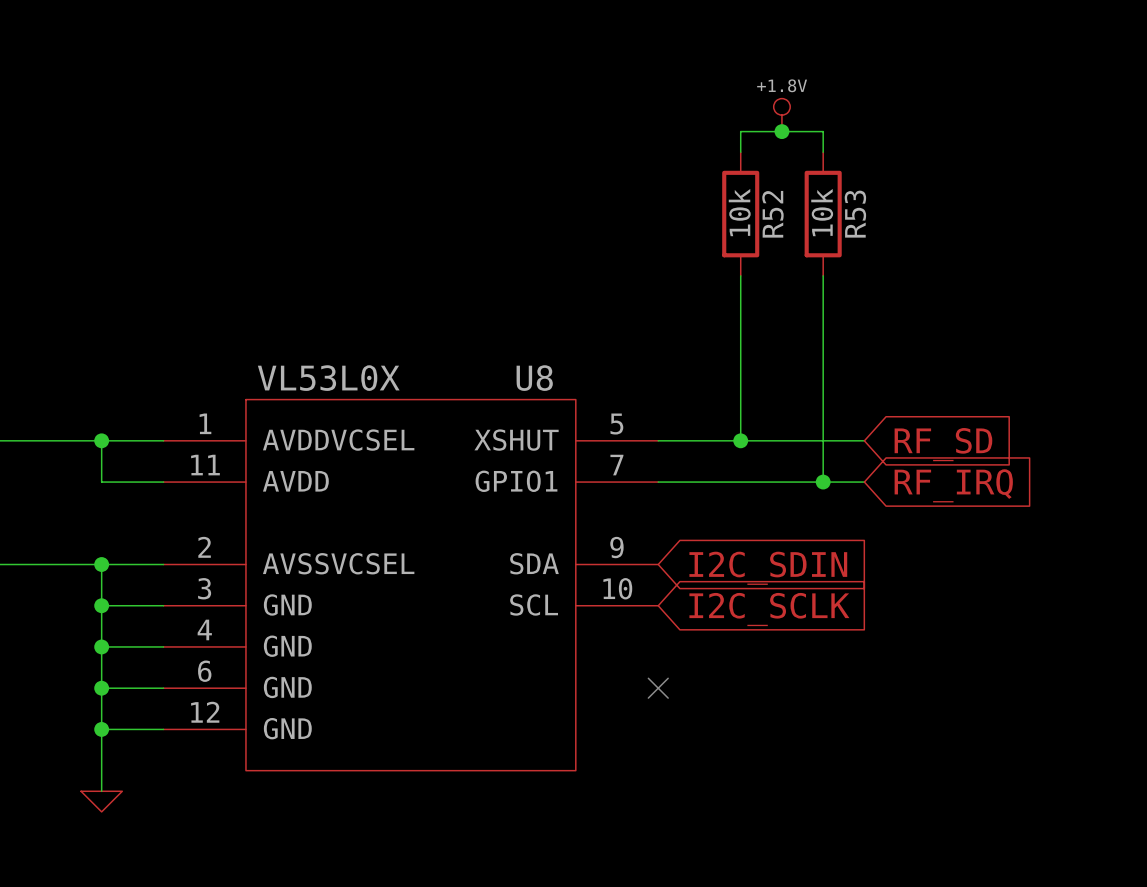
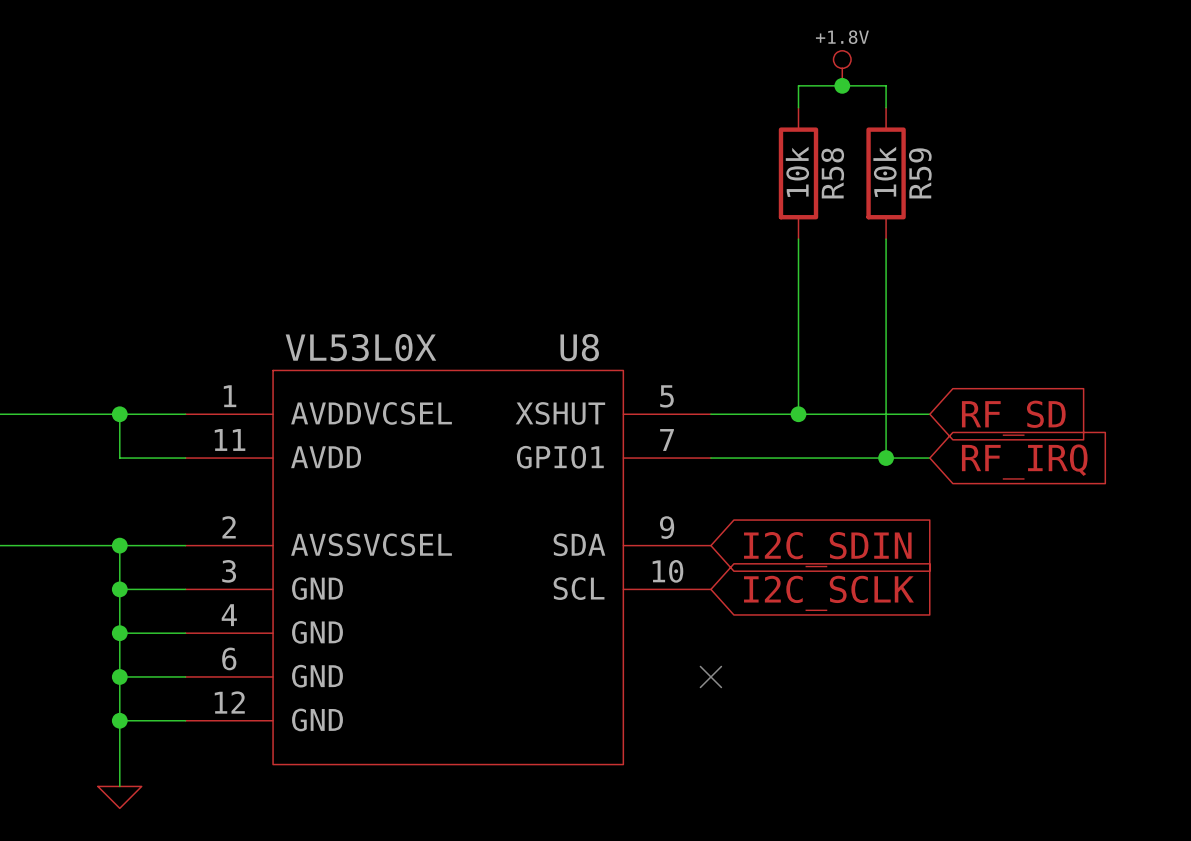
R52 name: R52 (772, 214) -> R58 (832, 173)
R53 name: R53 (855, 214) -> R59 (920, 173)

